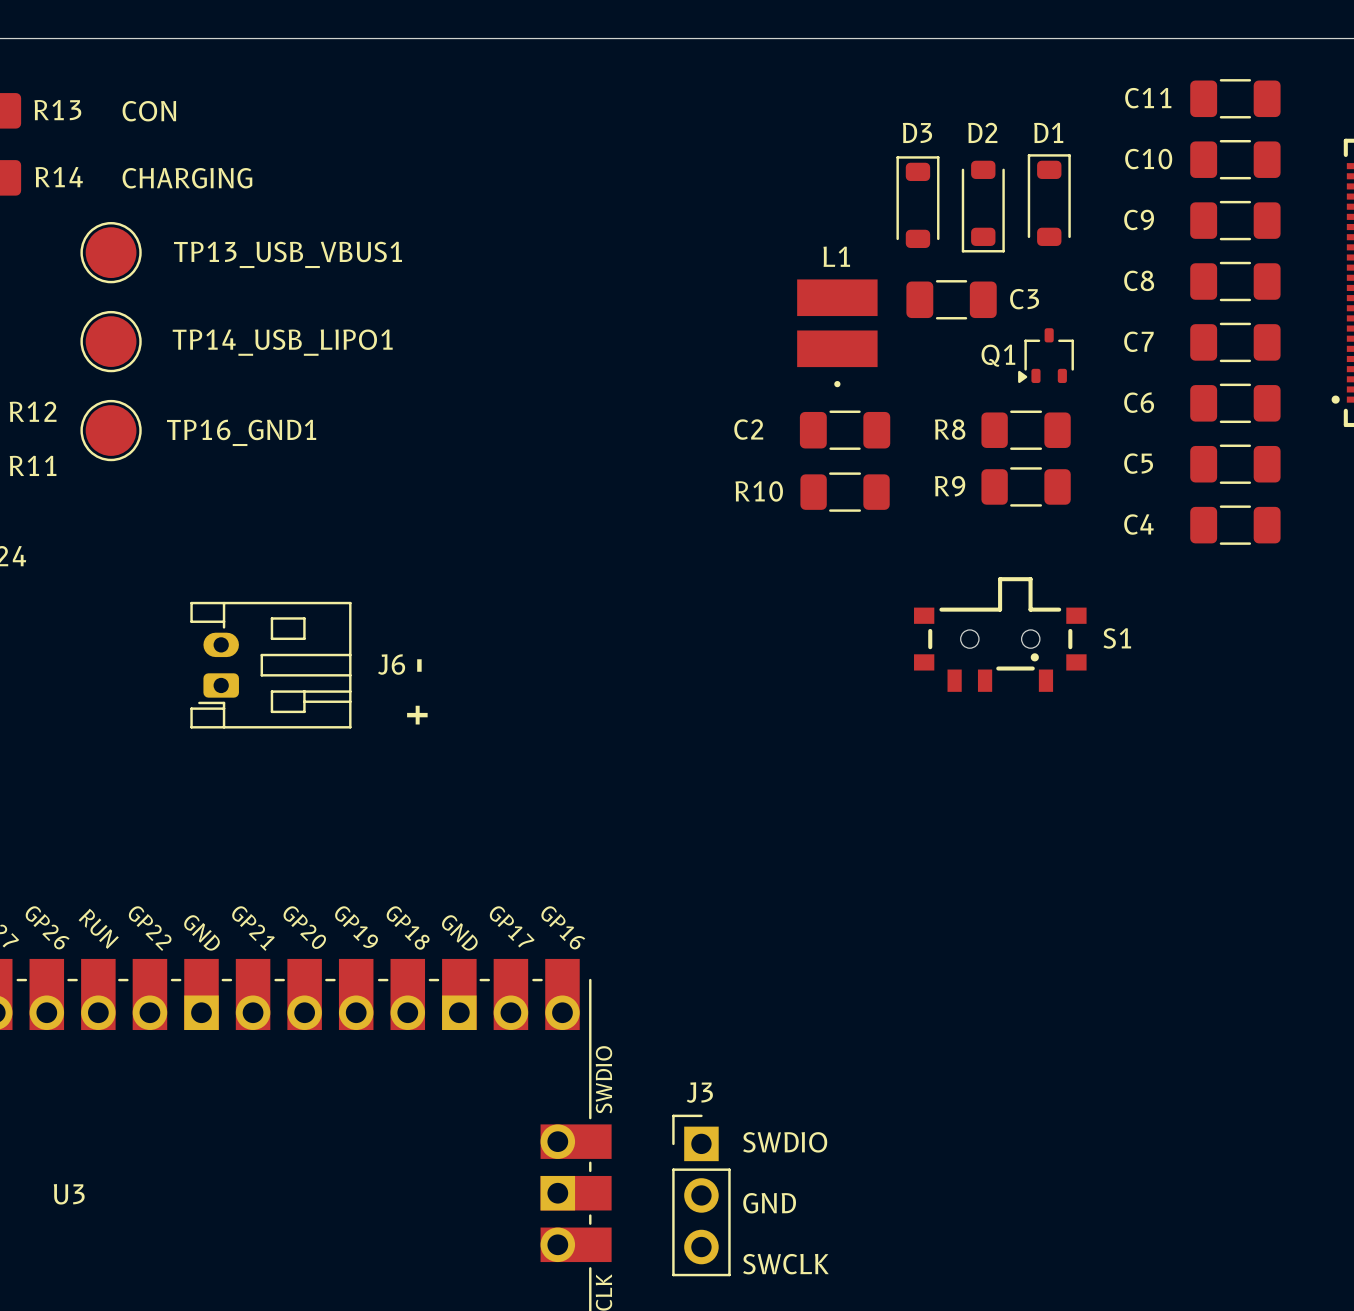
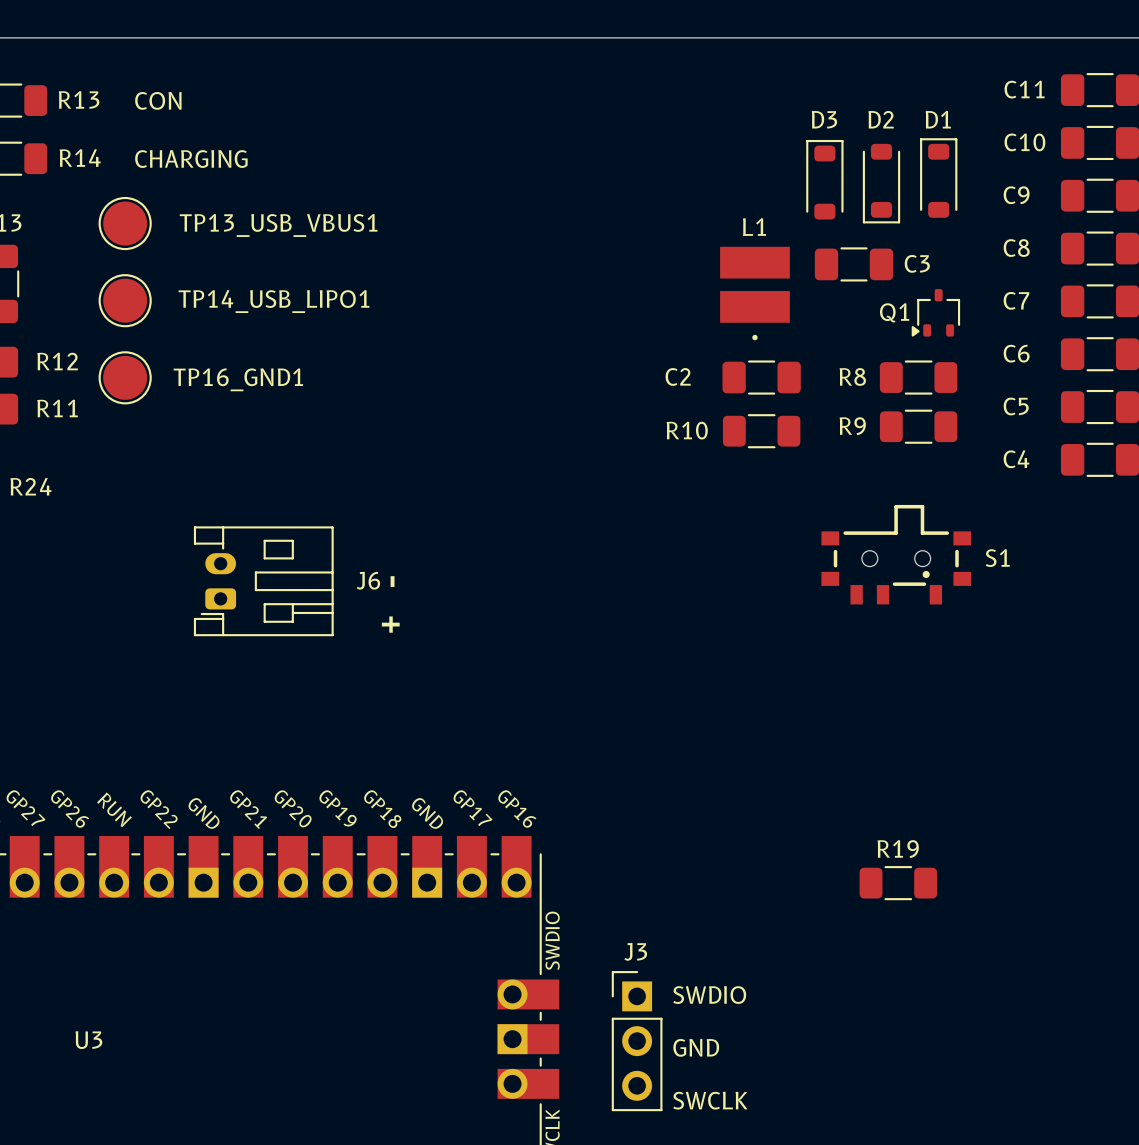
R19: none -> (898, 883)

